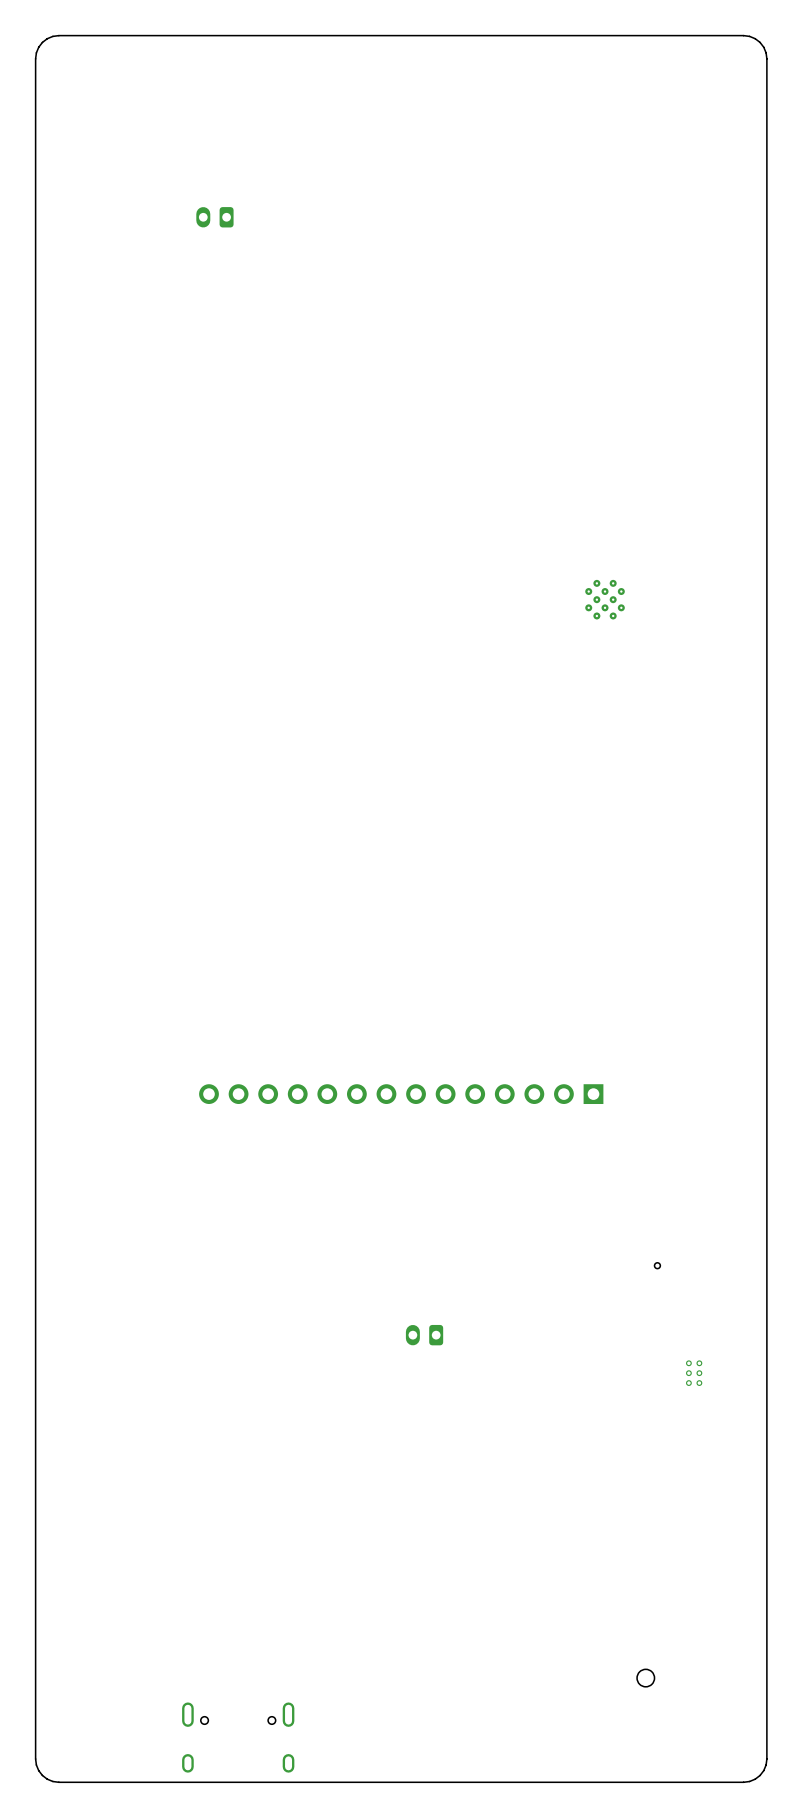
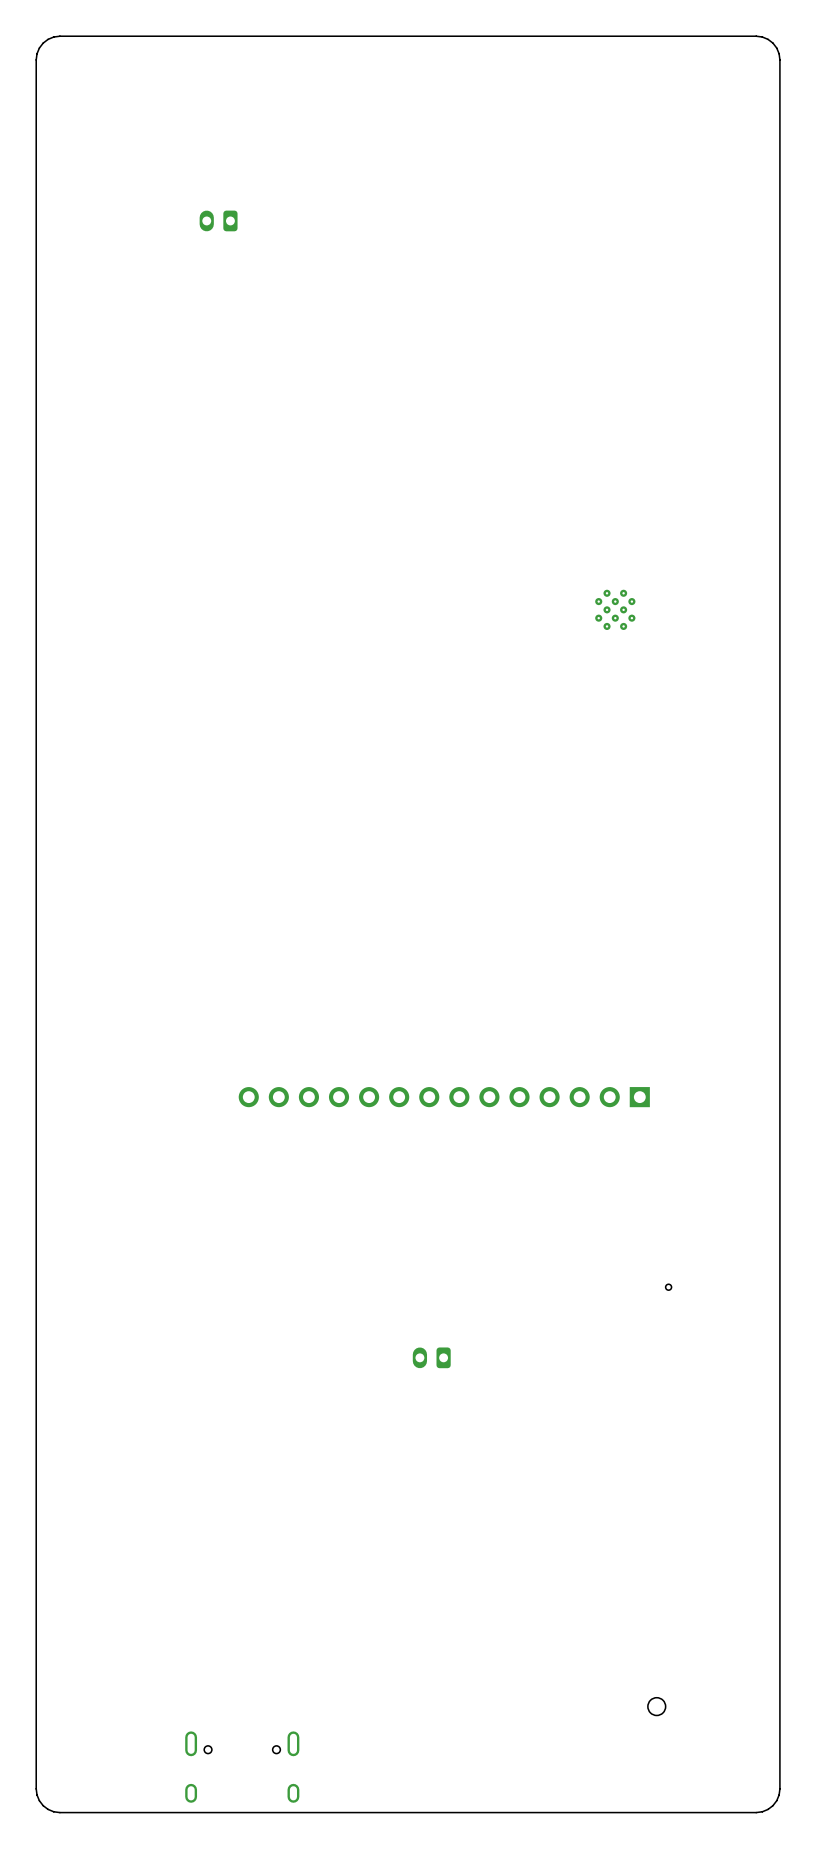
part position: (401, 1094) -> (444, 1097)
part: (694, 1373) -> none

